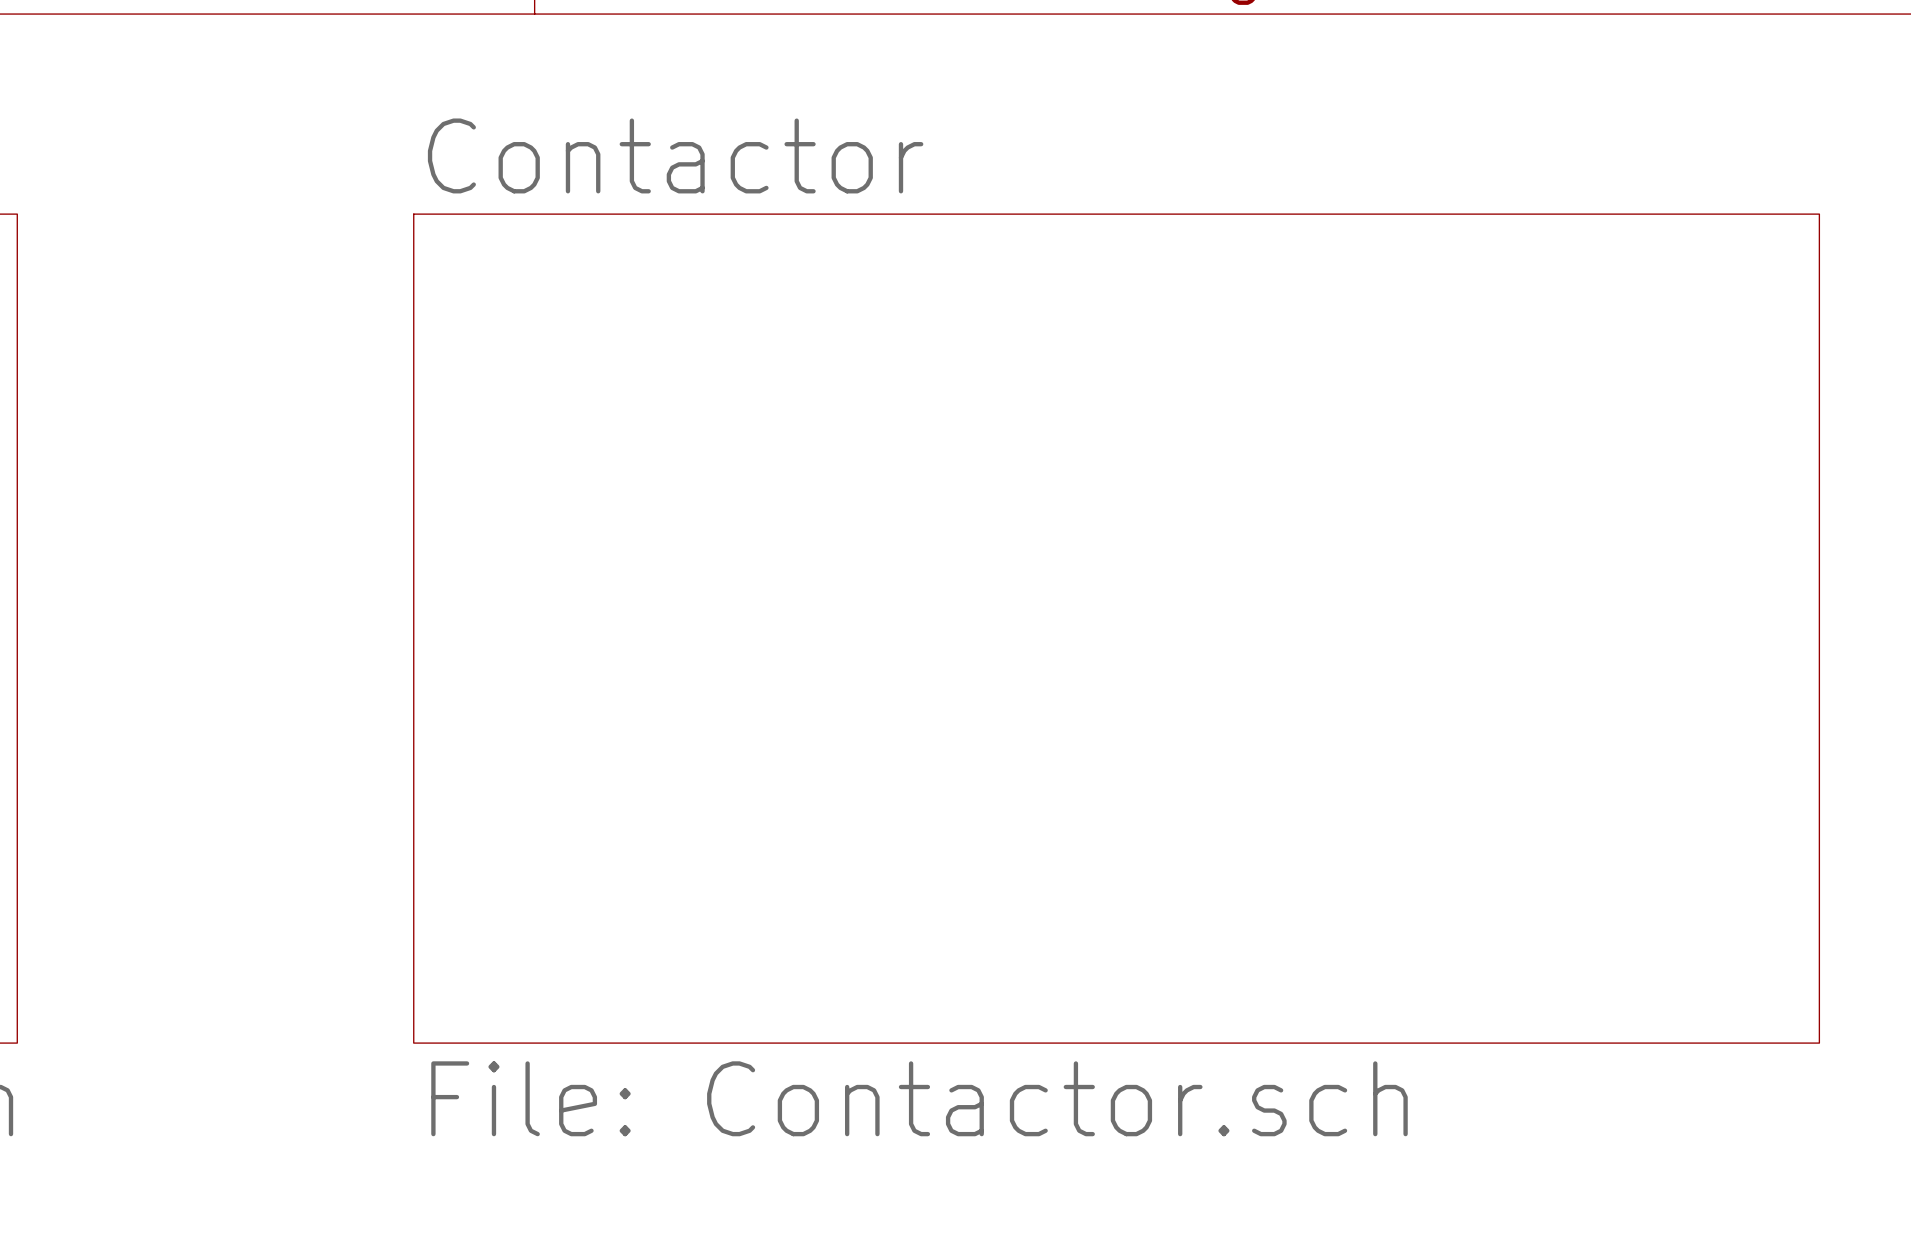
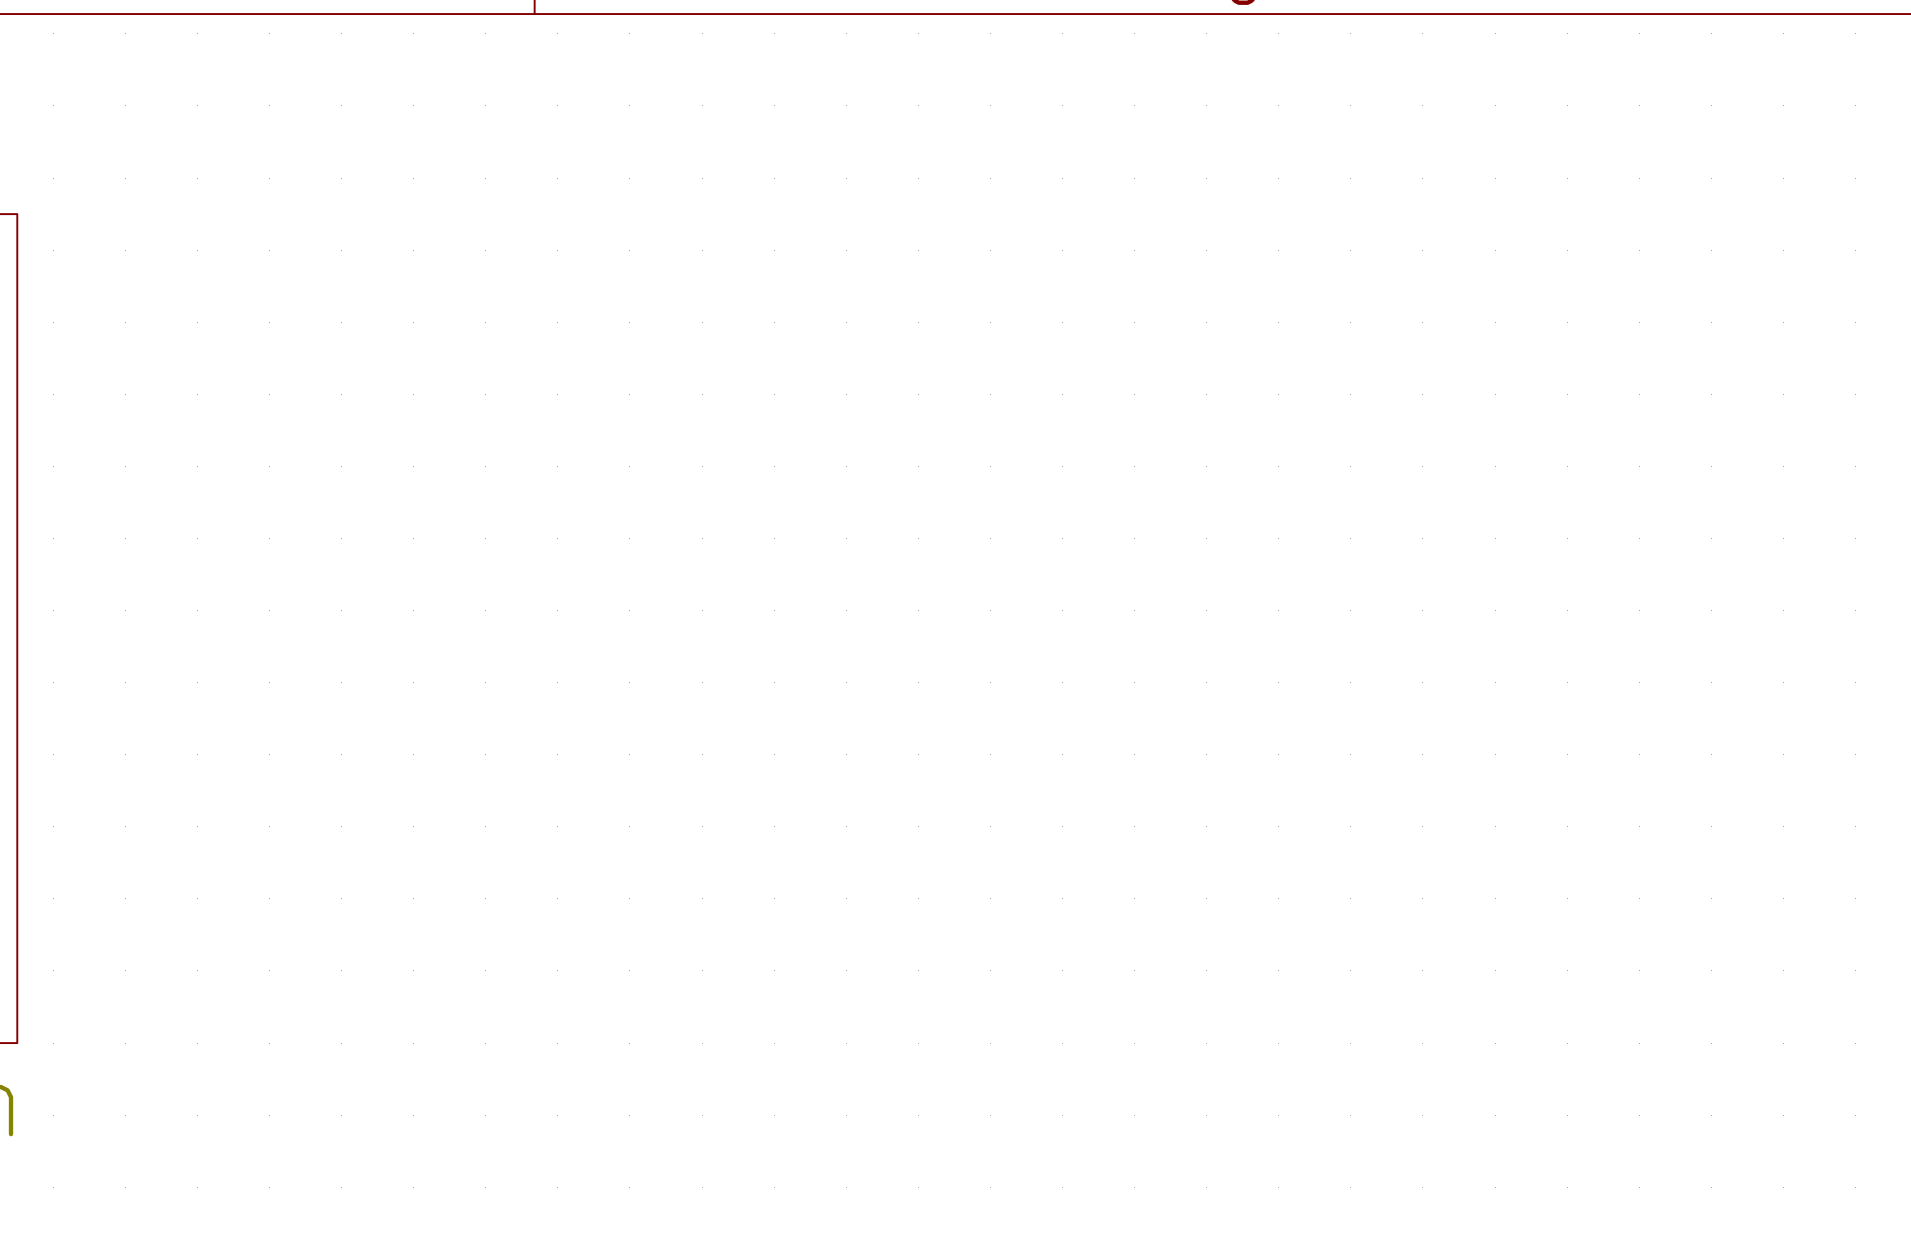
sheet Contactor: File: Contactor.sch (1116, 628) -> none

